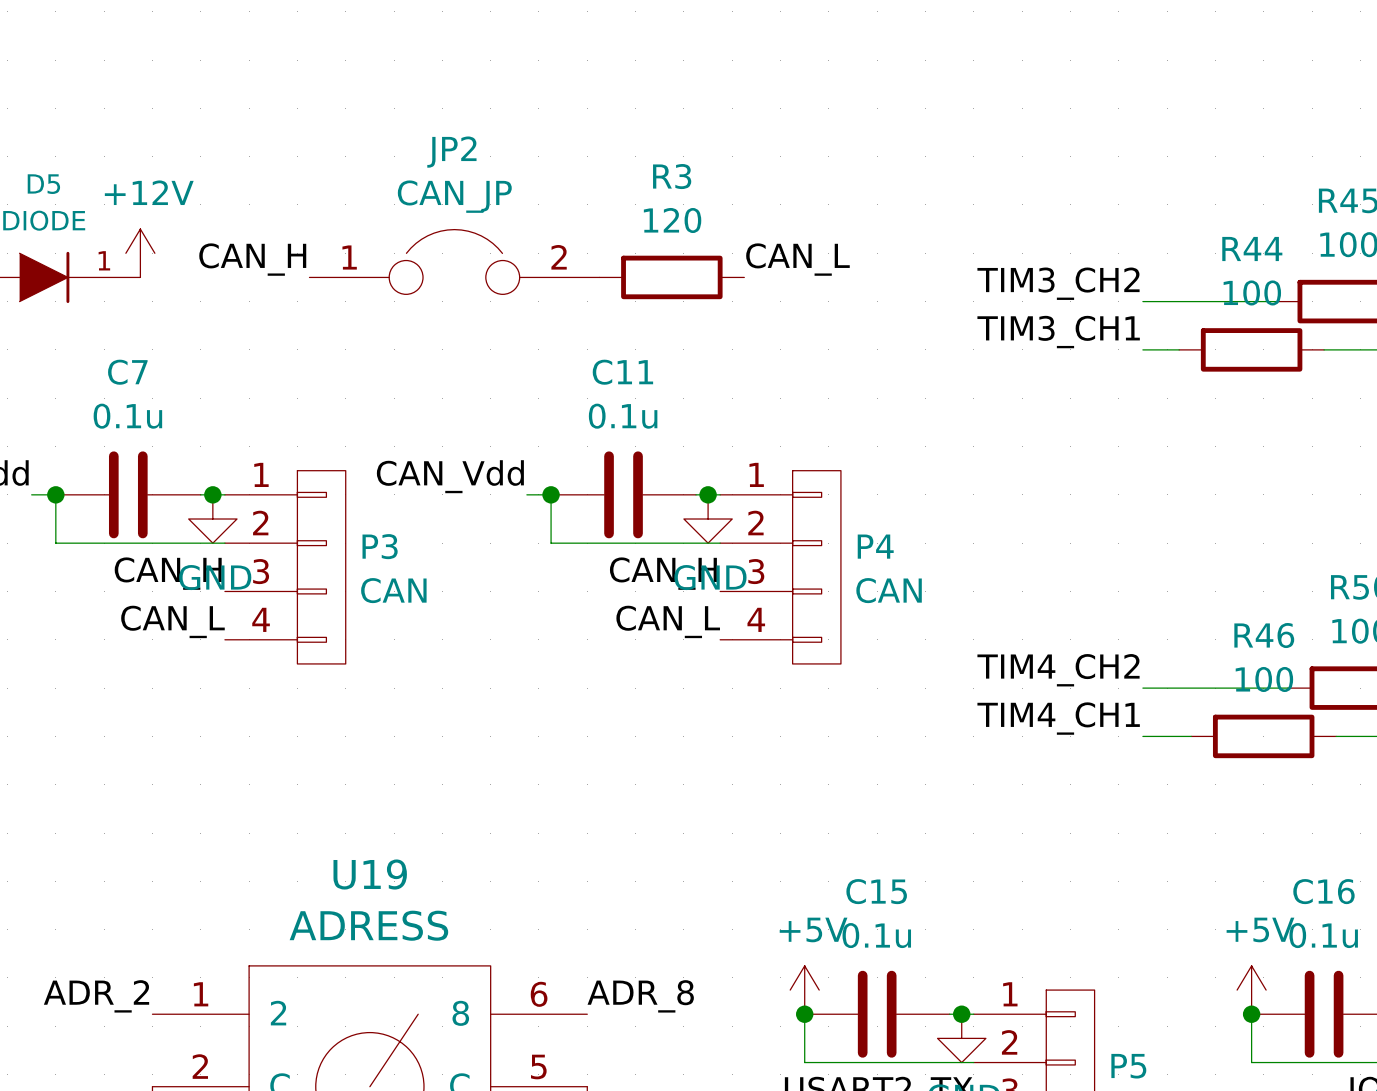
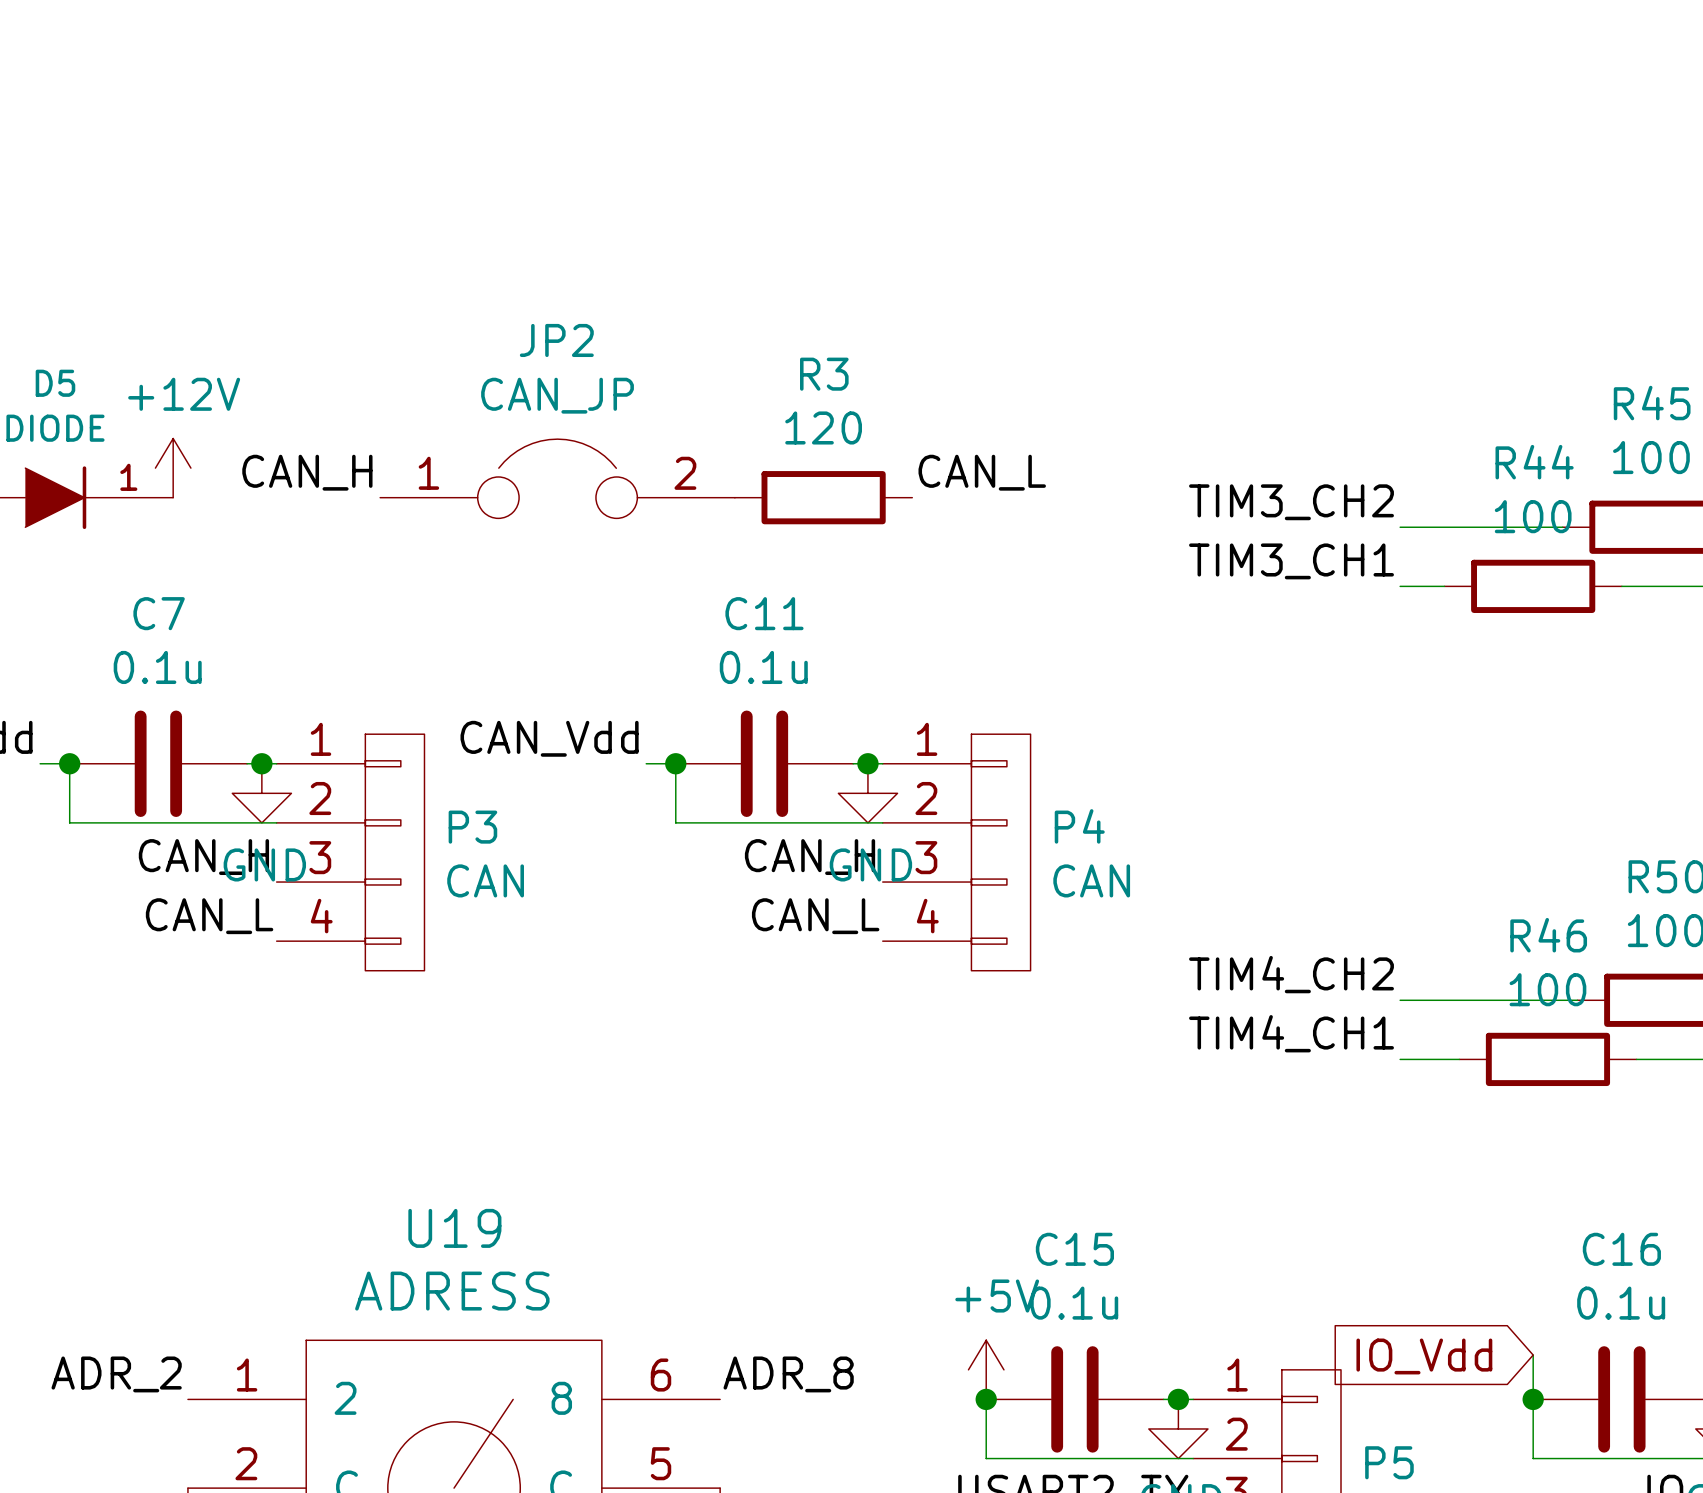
global label: none -> IO_Vdd (1424, 1356)
power symbol: +5V (1251, 990) -> none

